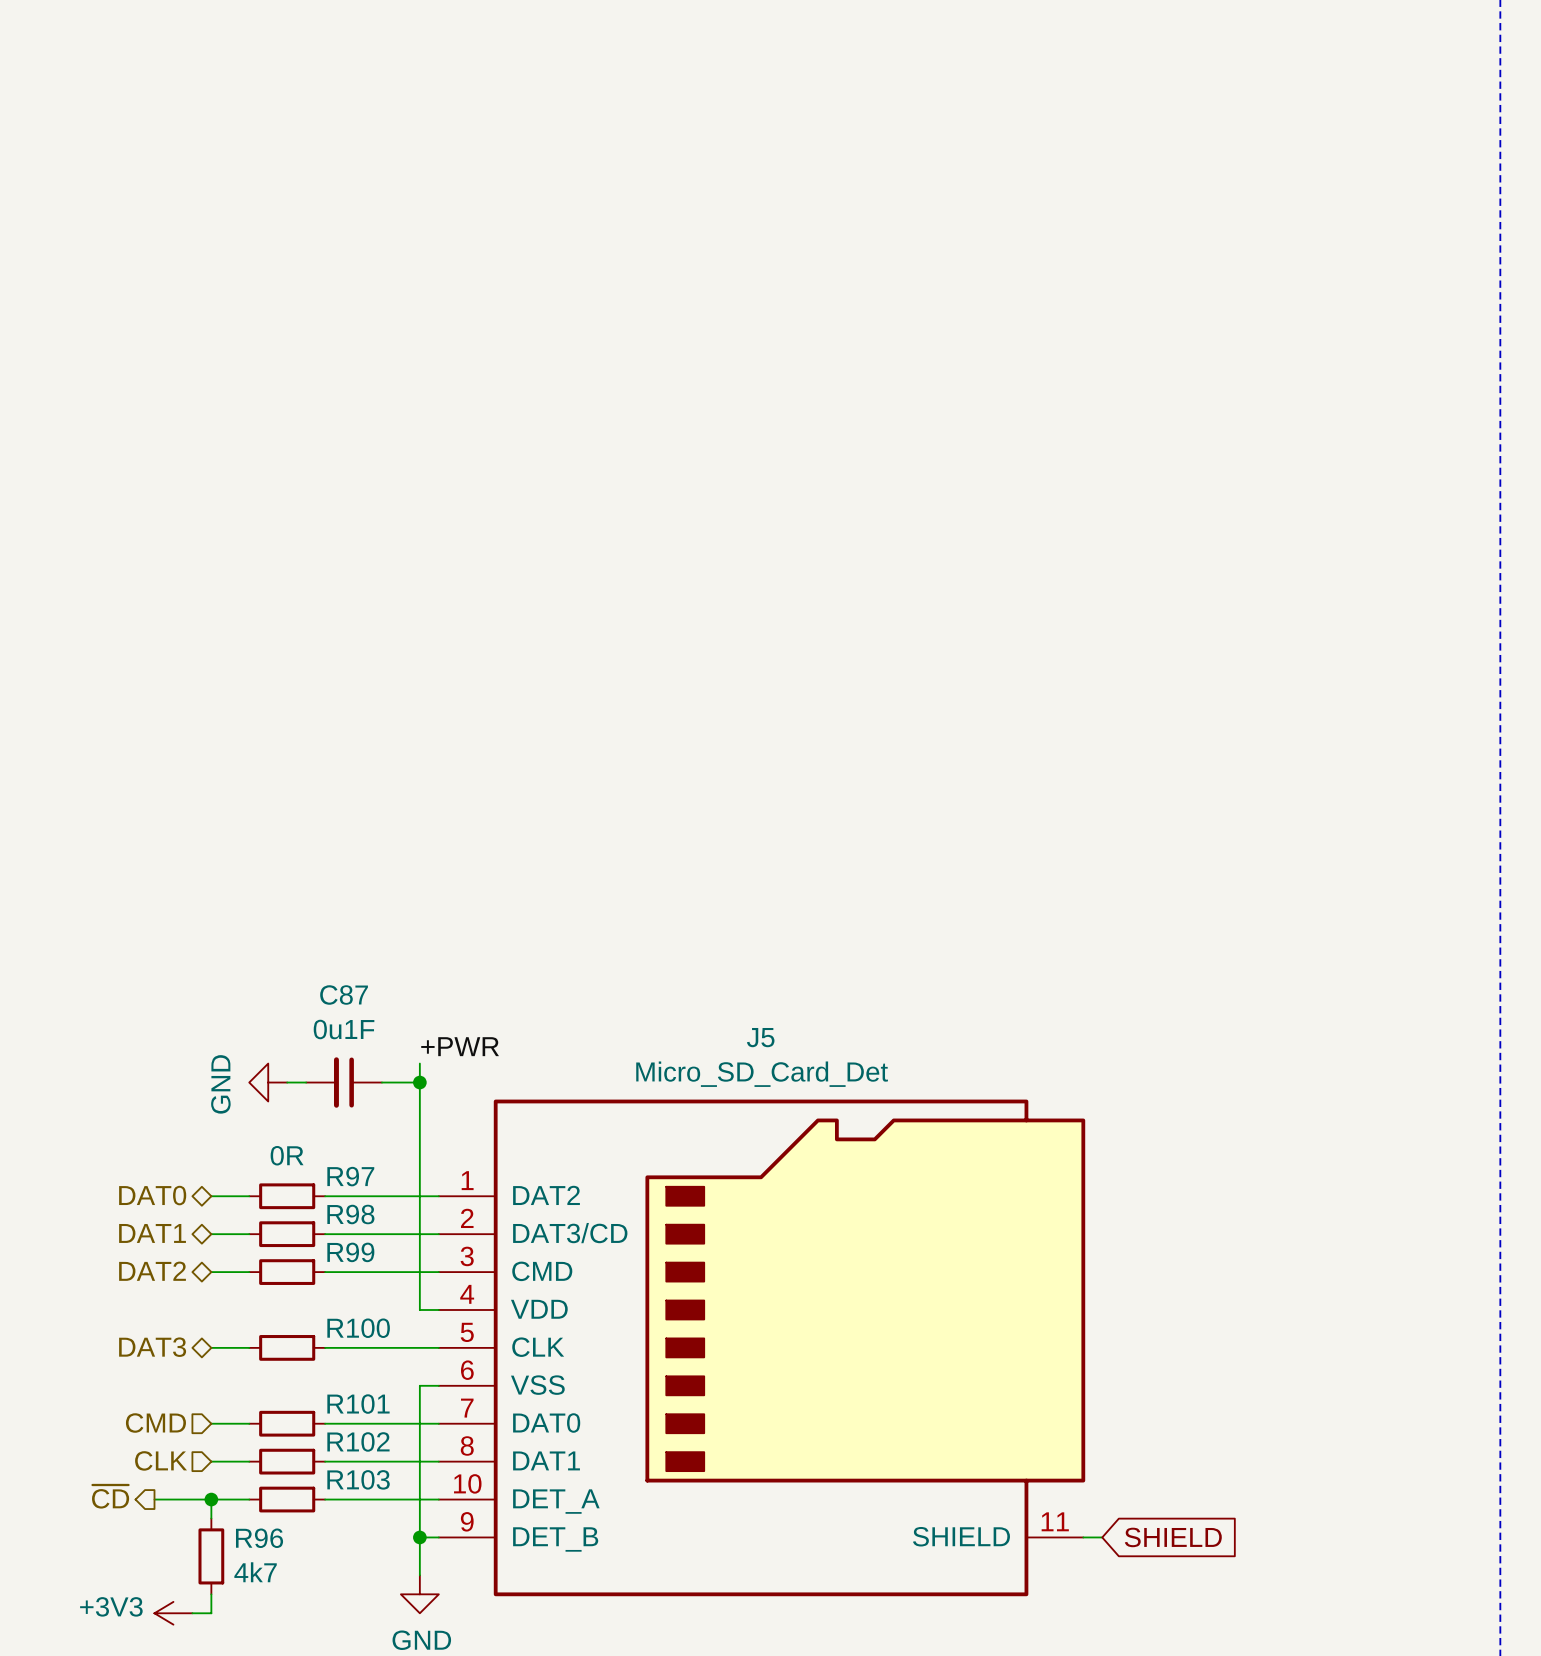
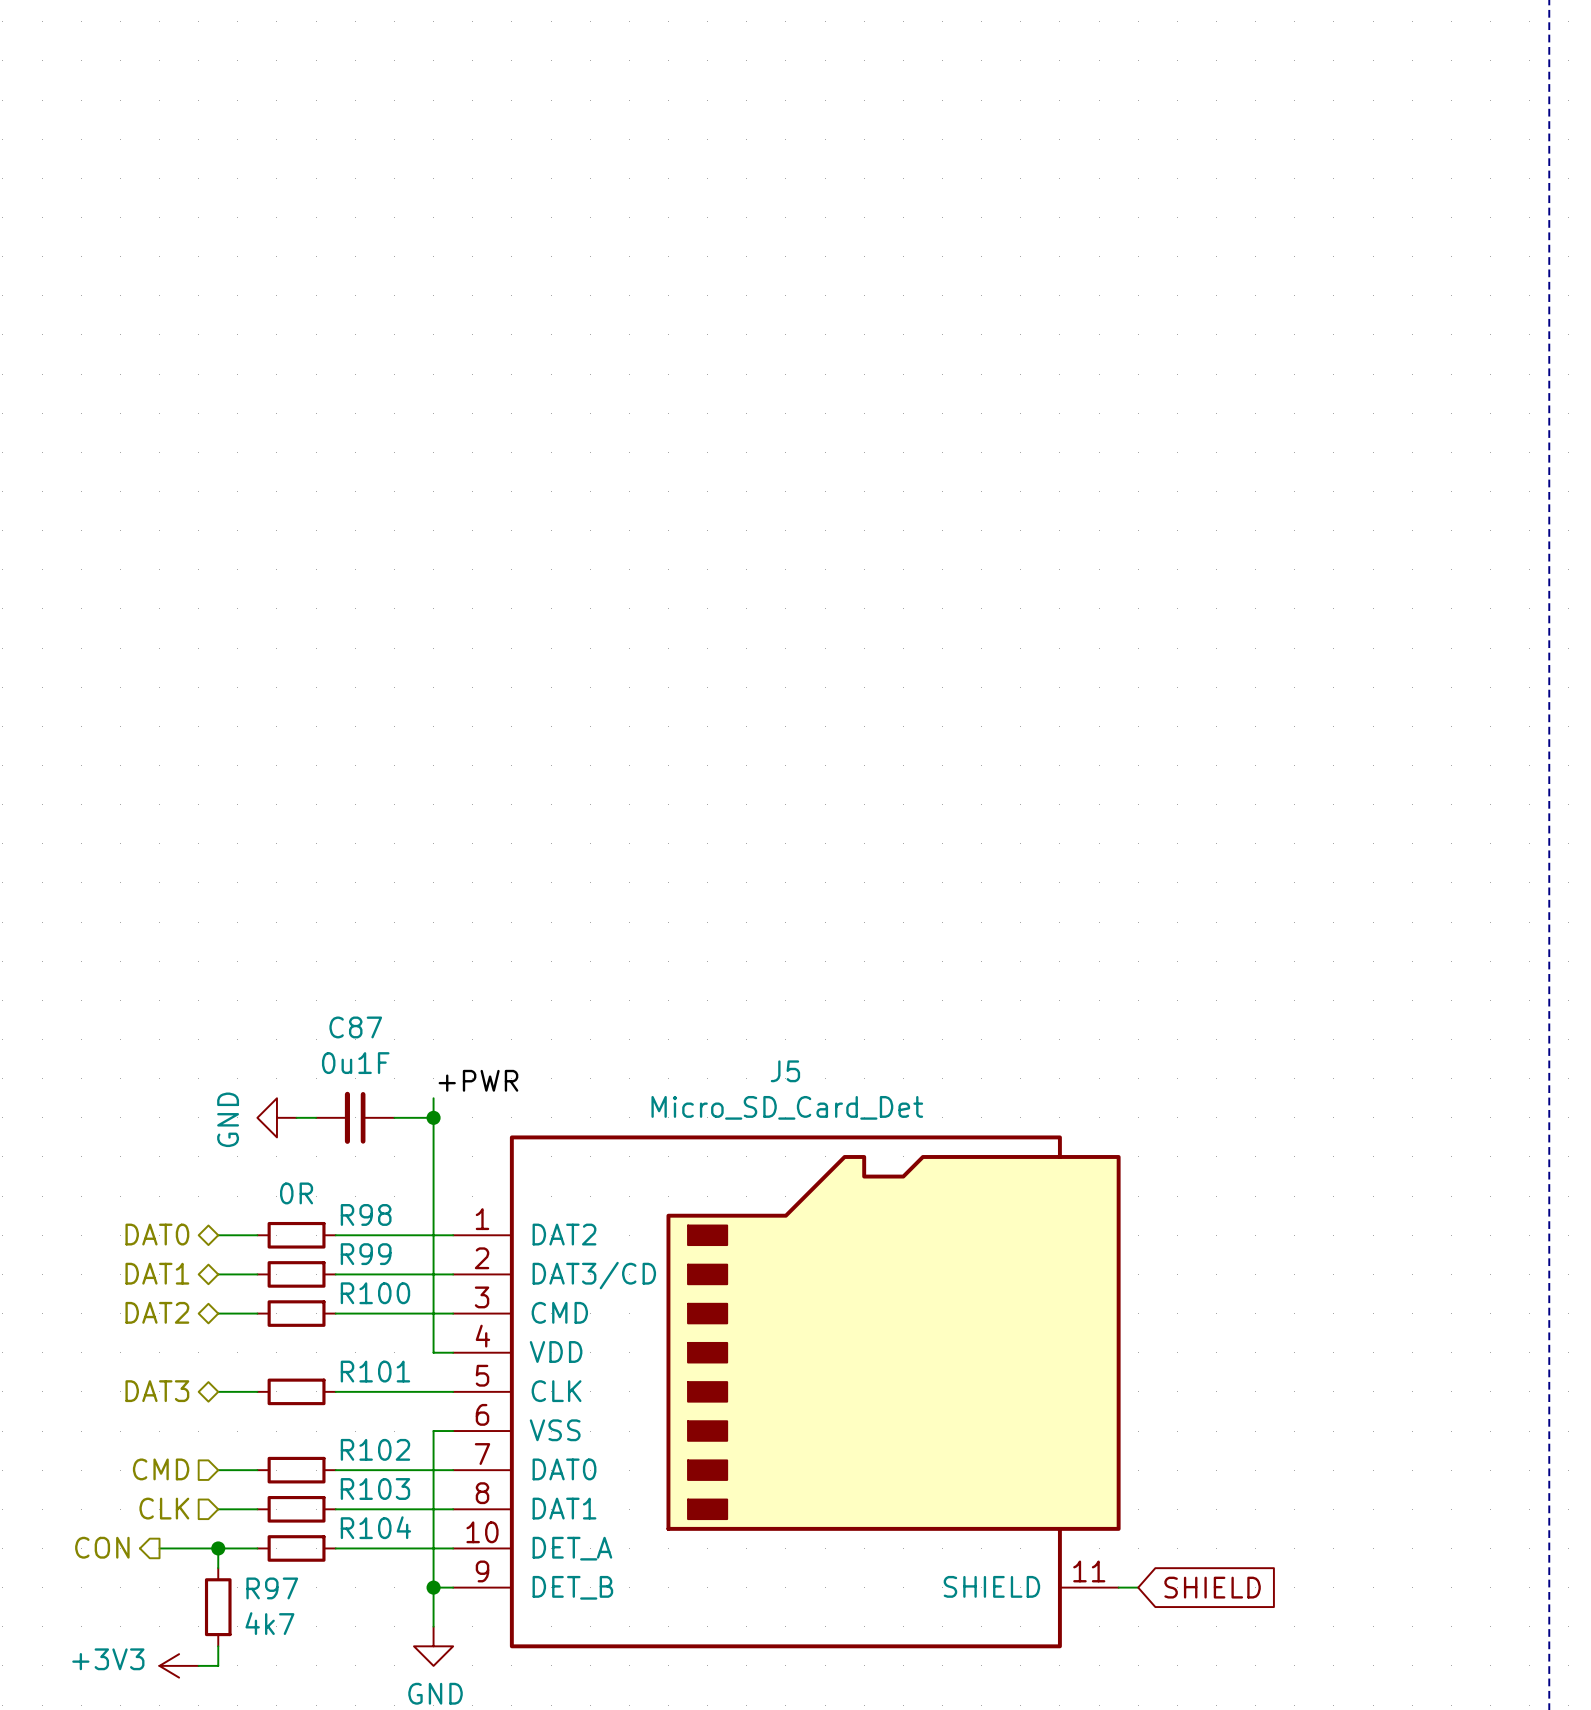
R97 name: R97 (350, 1176) -> R98 (366, 1214)
R98 name: R98 (350, 1214) -> R99 (366, 1254)
R99 name: R99 (350, 1252) -> R100 (375, 1293)
R100 name: R100 (358, 1328) -> R101 (375, 1371)
R101 name: R101 (358, 1404) -> R102 (375, 1449)
R102 name: R102 (358, 1441) -> R103 (375, 1489)
R103 name: R103 (358, 1479) -> R104 (375, 1527)
hierarchical label: ~{CD} (110, 1496) -> CON (102, 1547)
R96 name: R96 (259, 1538) -> R97 (272, 1588)

